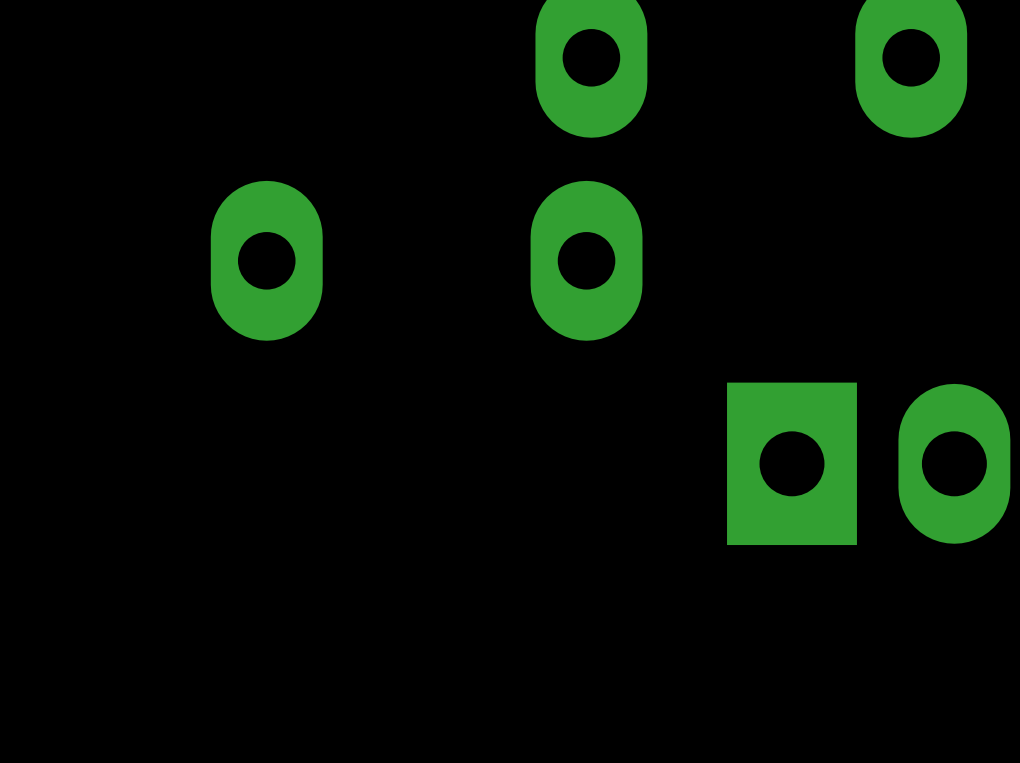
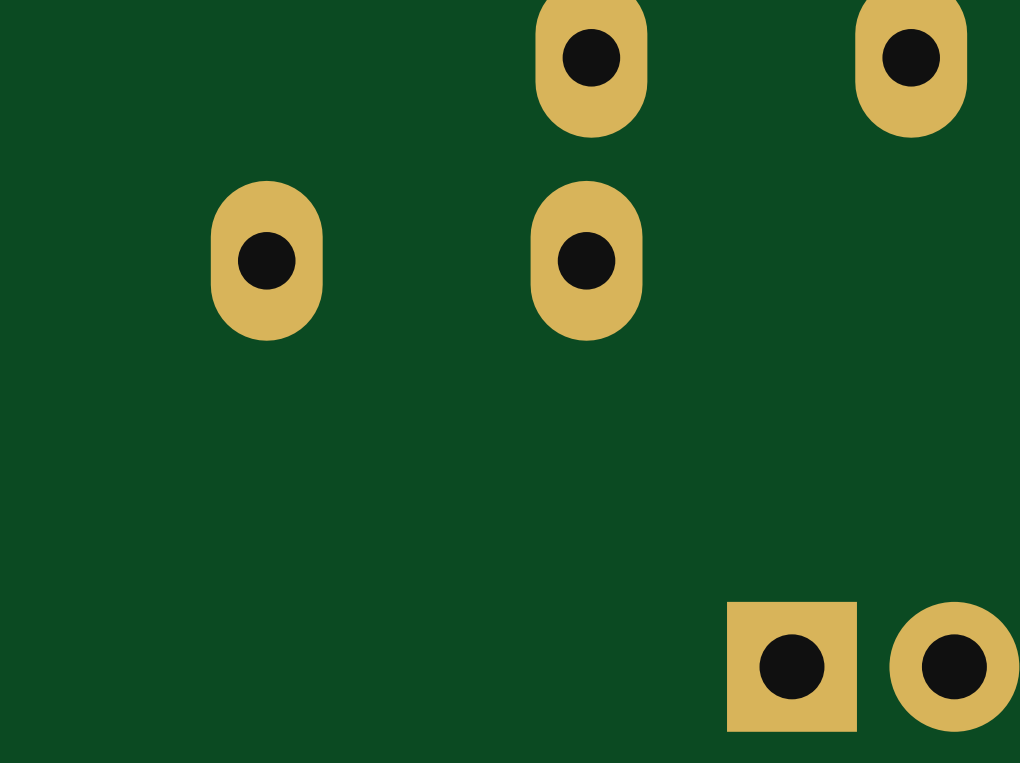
part: (868, 463) -> none
part: none -> (873, 666)

